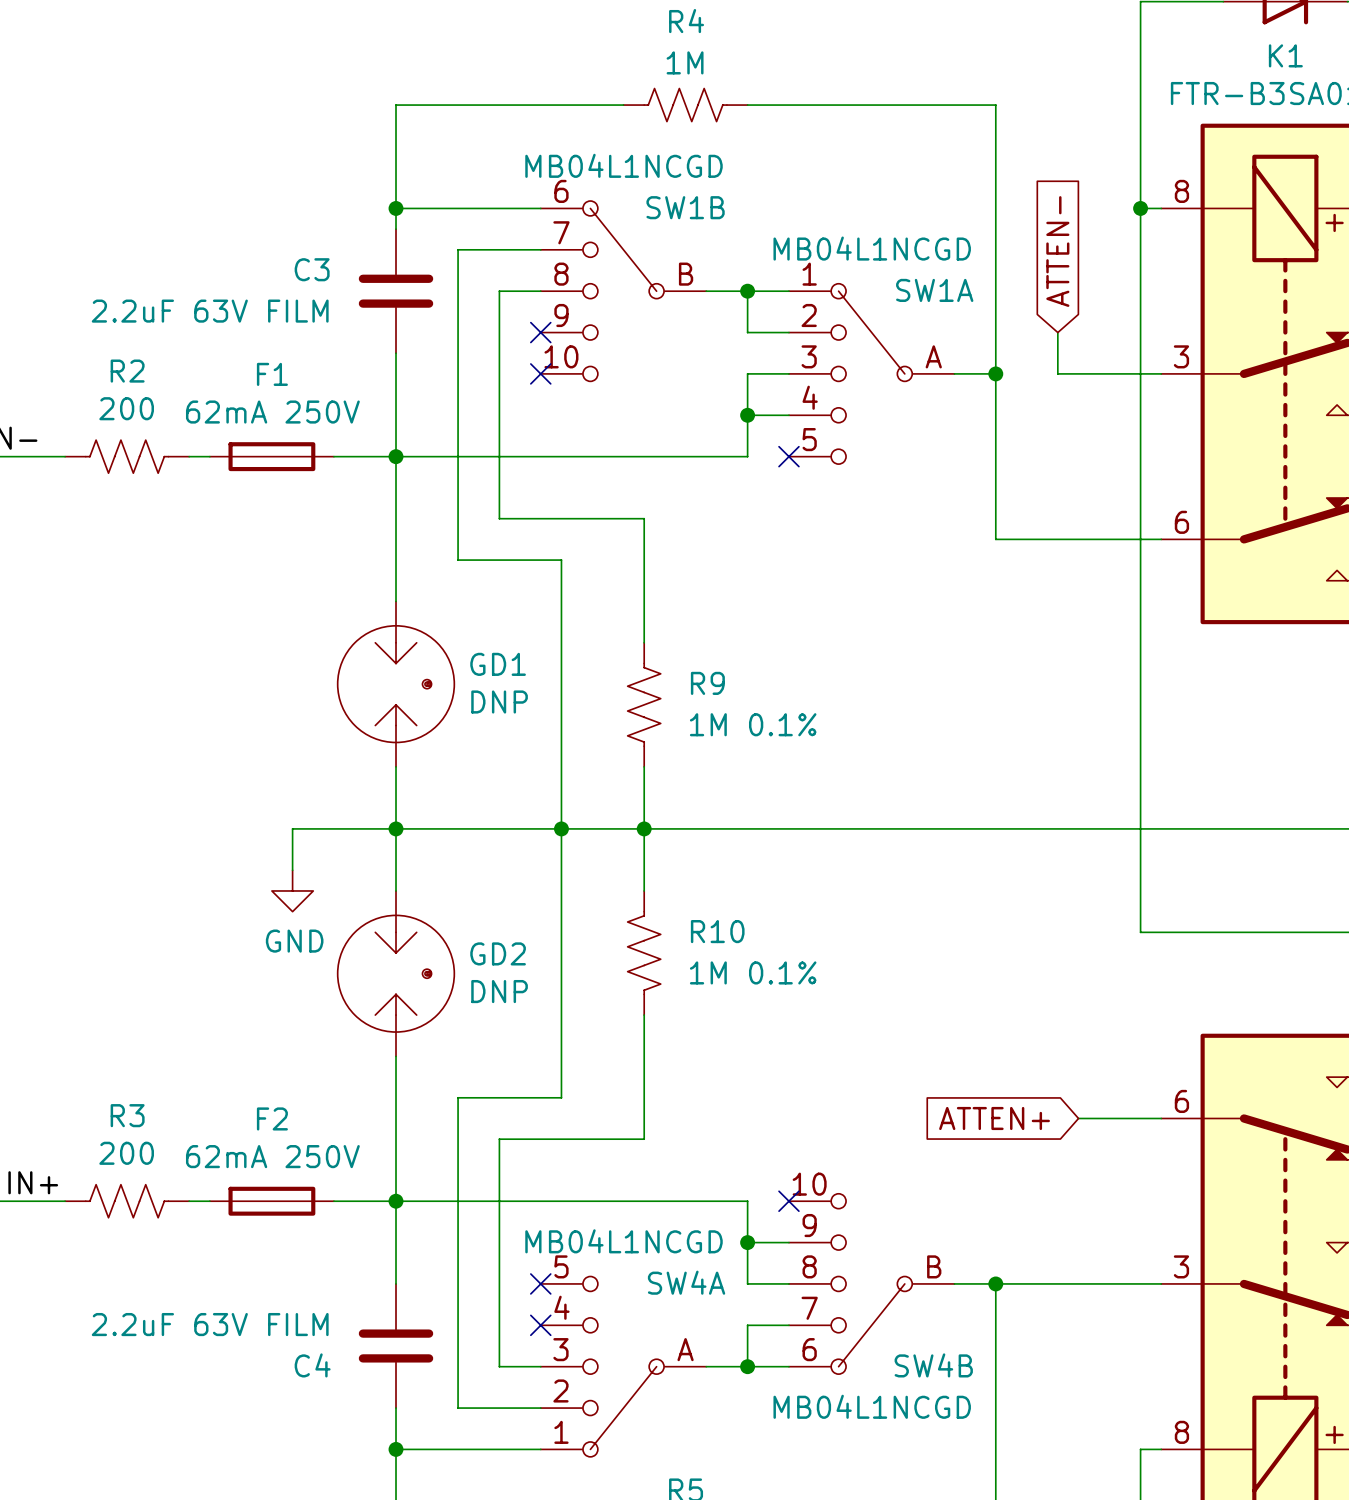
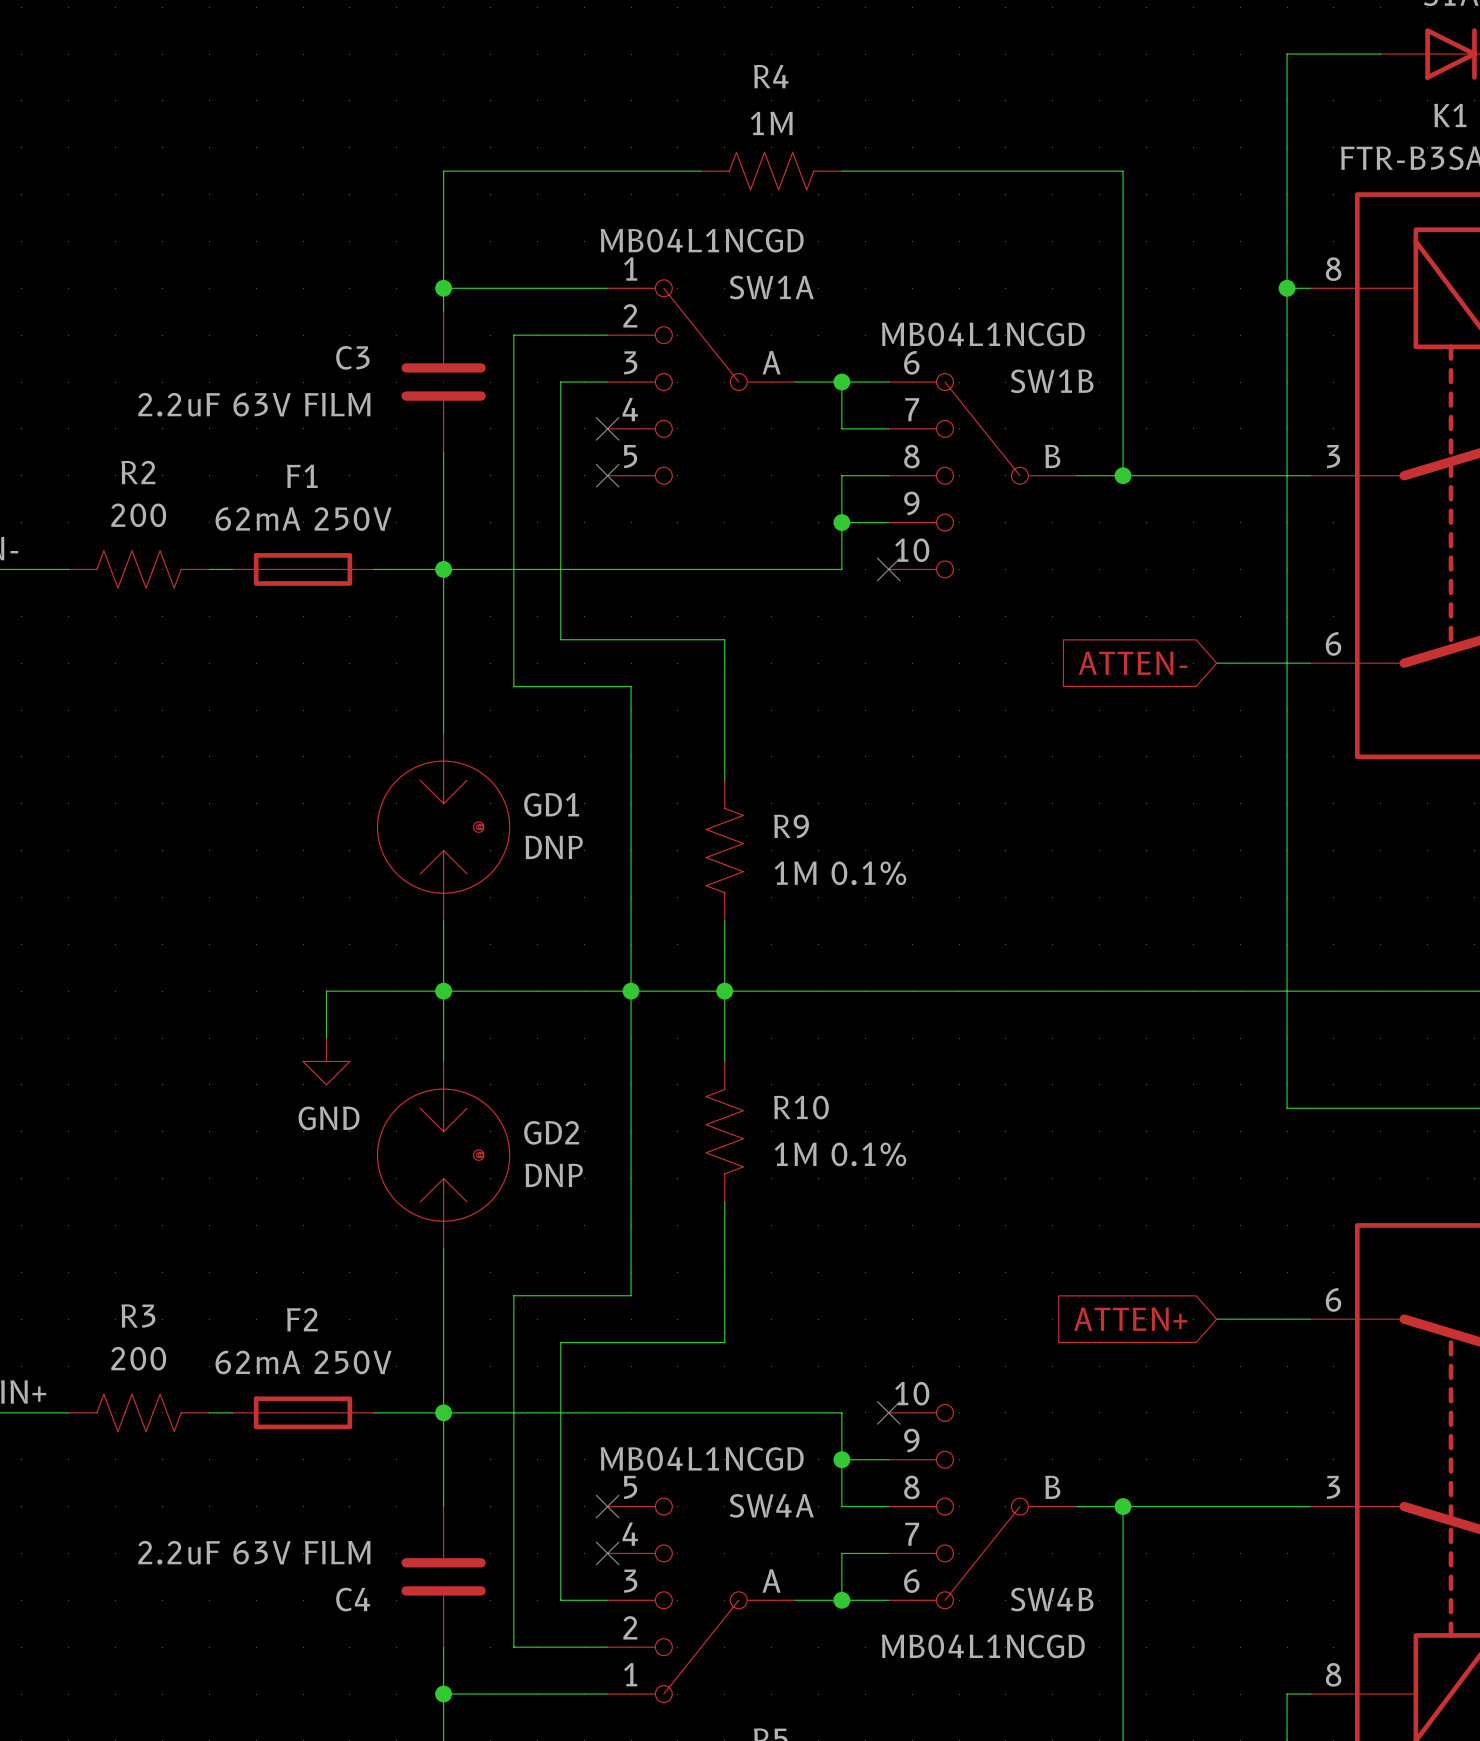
global label rotation: 0° (1057, 251) -> 90° counterclockwise (1133, 663)
global label position: ATTEN- (1057, 251) -> ATTEN- (1133, 663)
SW1B position: (623, 291) -> (982, 475)
wire: (1057, 332) (1057, 373) -> (1123, 475) (1193, 475)
SW1A position: (871, 373) -> (701, 382)
wire: (995, 373) (995, 539) (1078, 539) -> none

